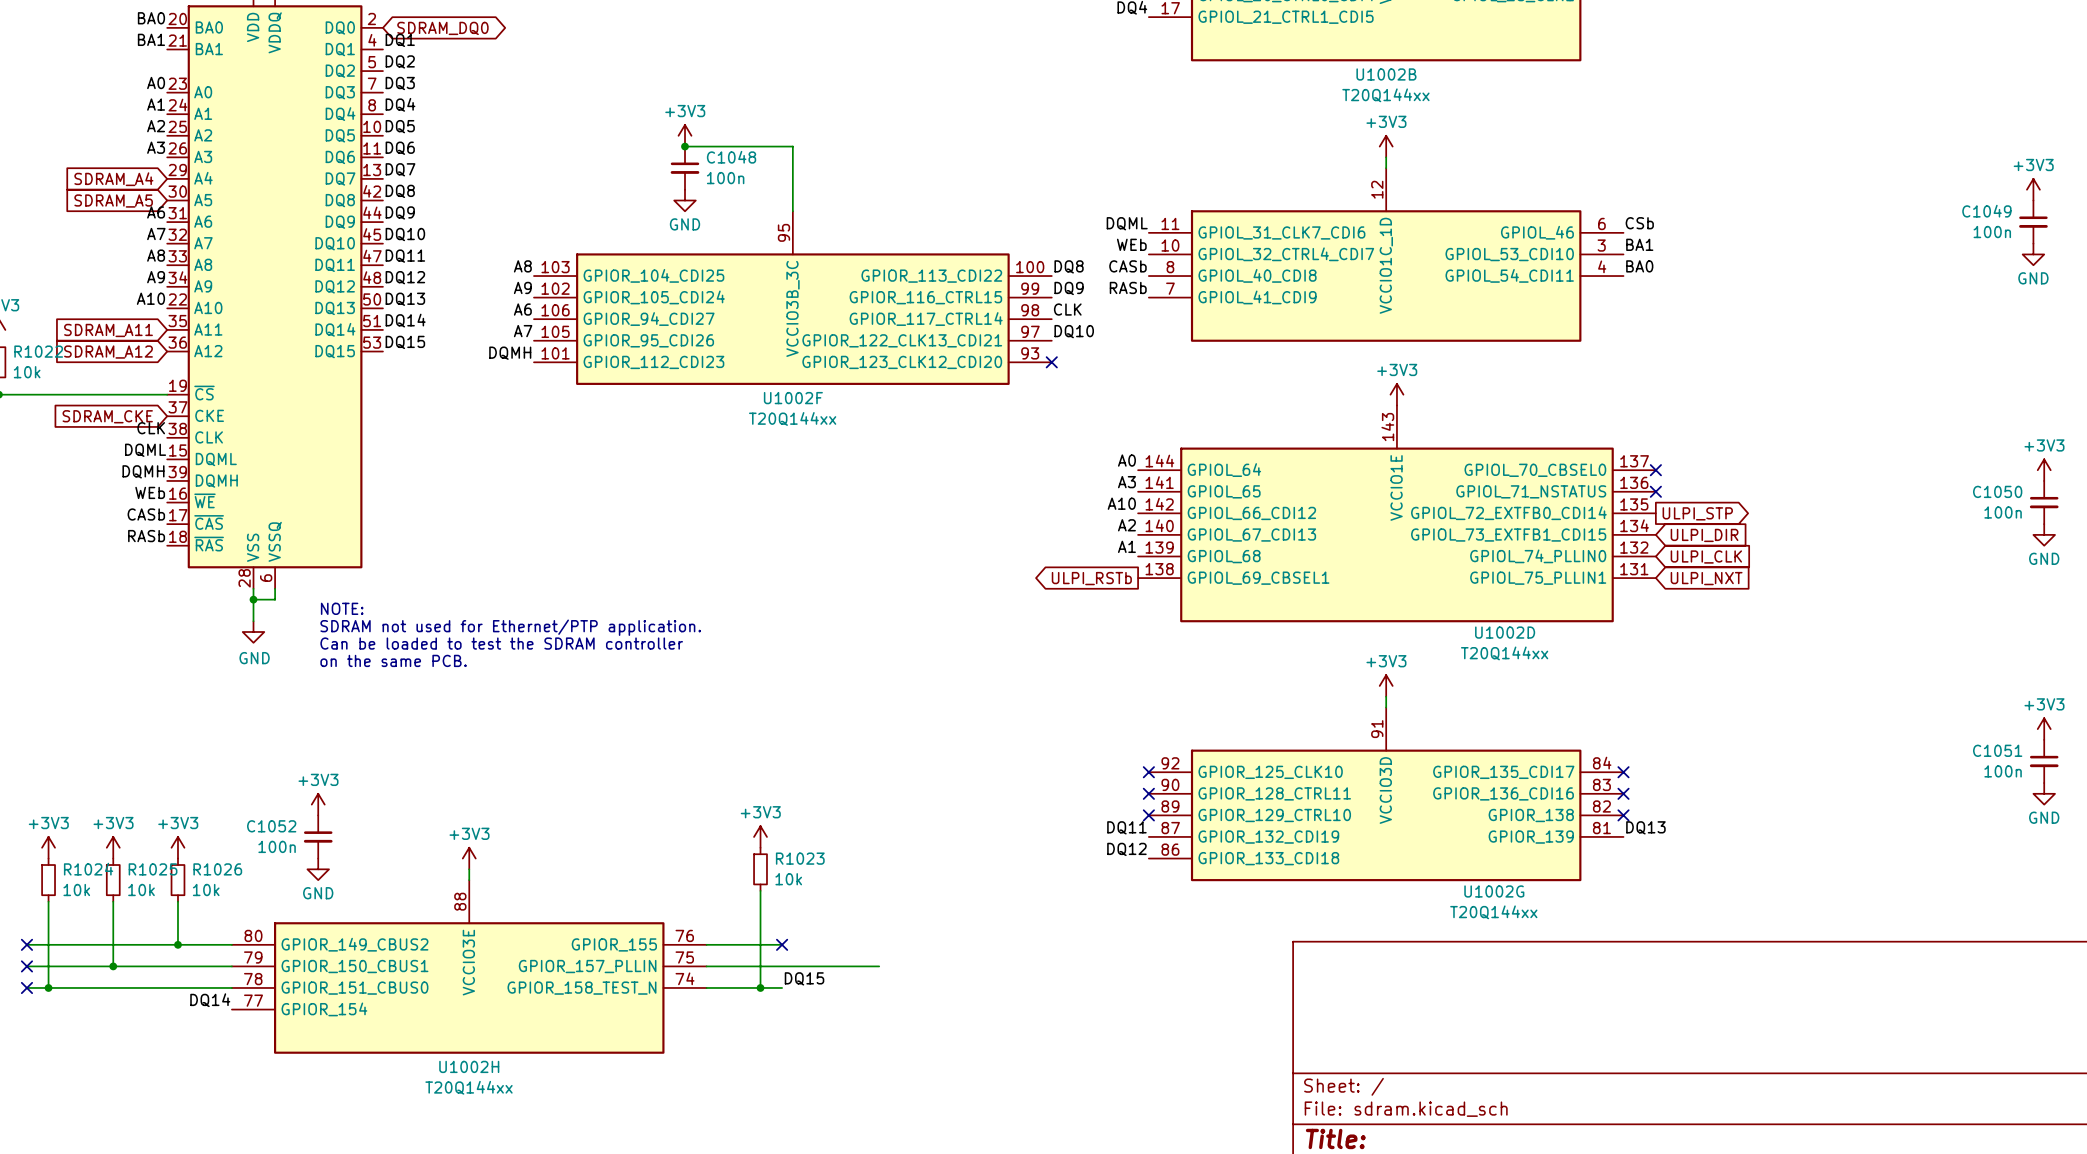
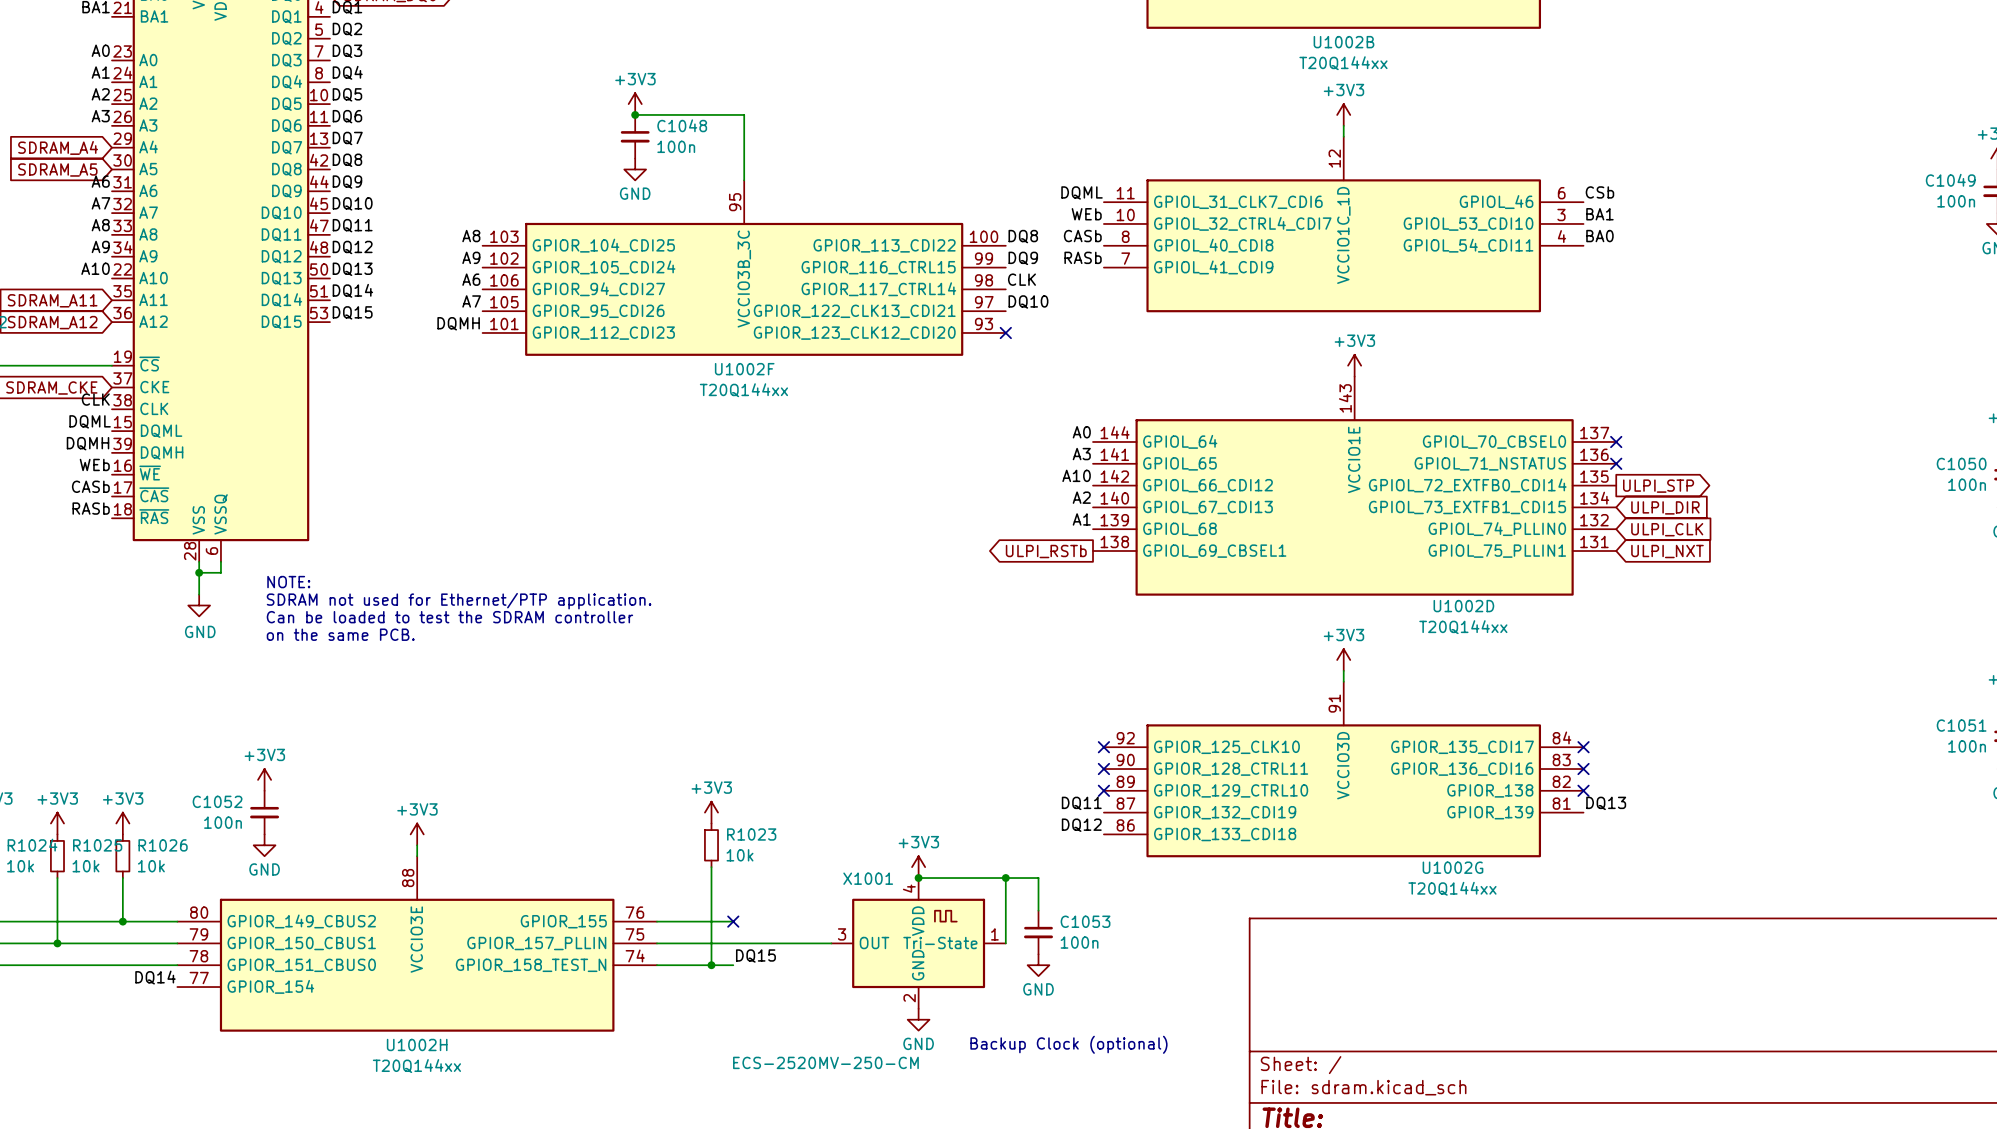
power symbol: none -> +3V3 (918, 867)
wire: none -> (918, 878) (1038, 878) (1038, 910)
junction: none -> (918, 878)
wire: none -> (1005, 878) (1005, 943)
junction: none -> (1005, 878)
C1053: none -> 100n (1038, 932)
X1001: none -> ECS-2520MV-250-CM (918, 943)
power symbol: none -> GND (1038, 965)
power symbol: none -> GND (918, 1019)
text: none -> Backup Clock (optional) (1068, 1044)

